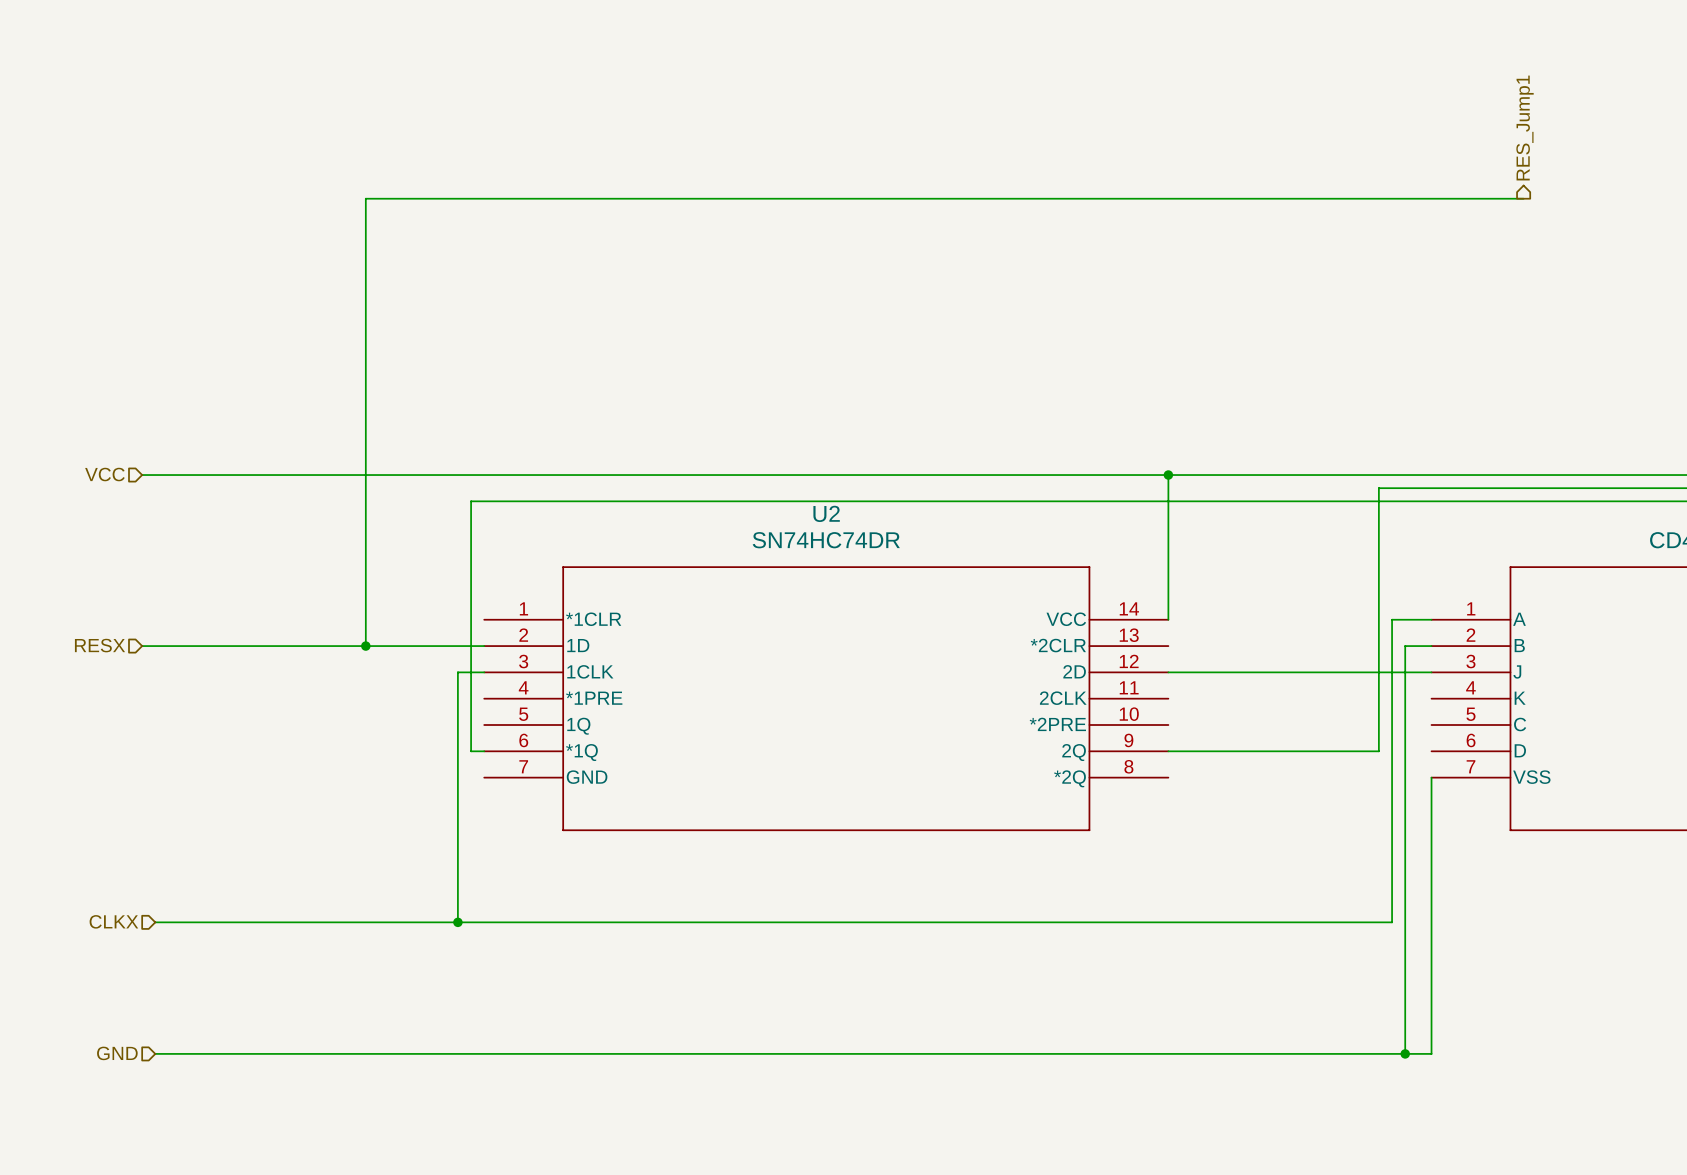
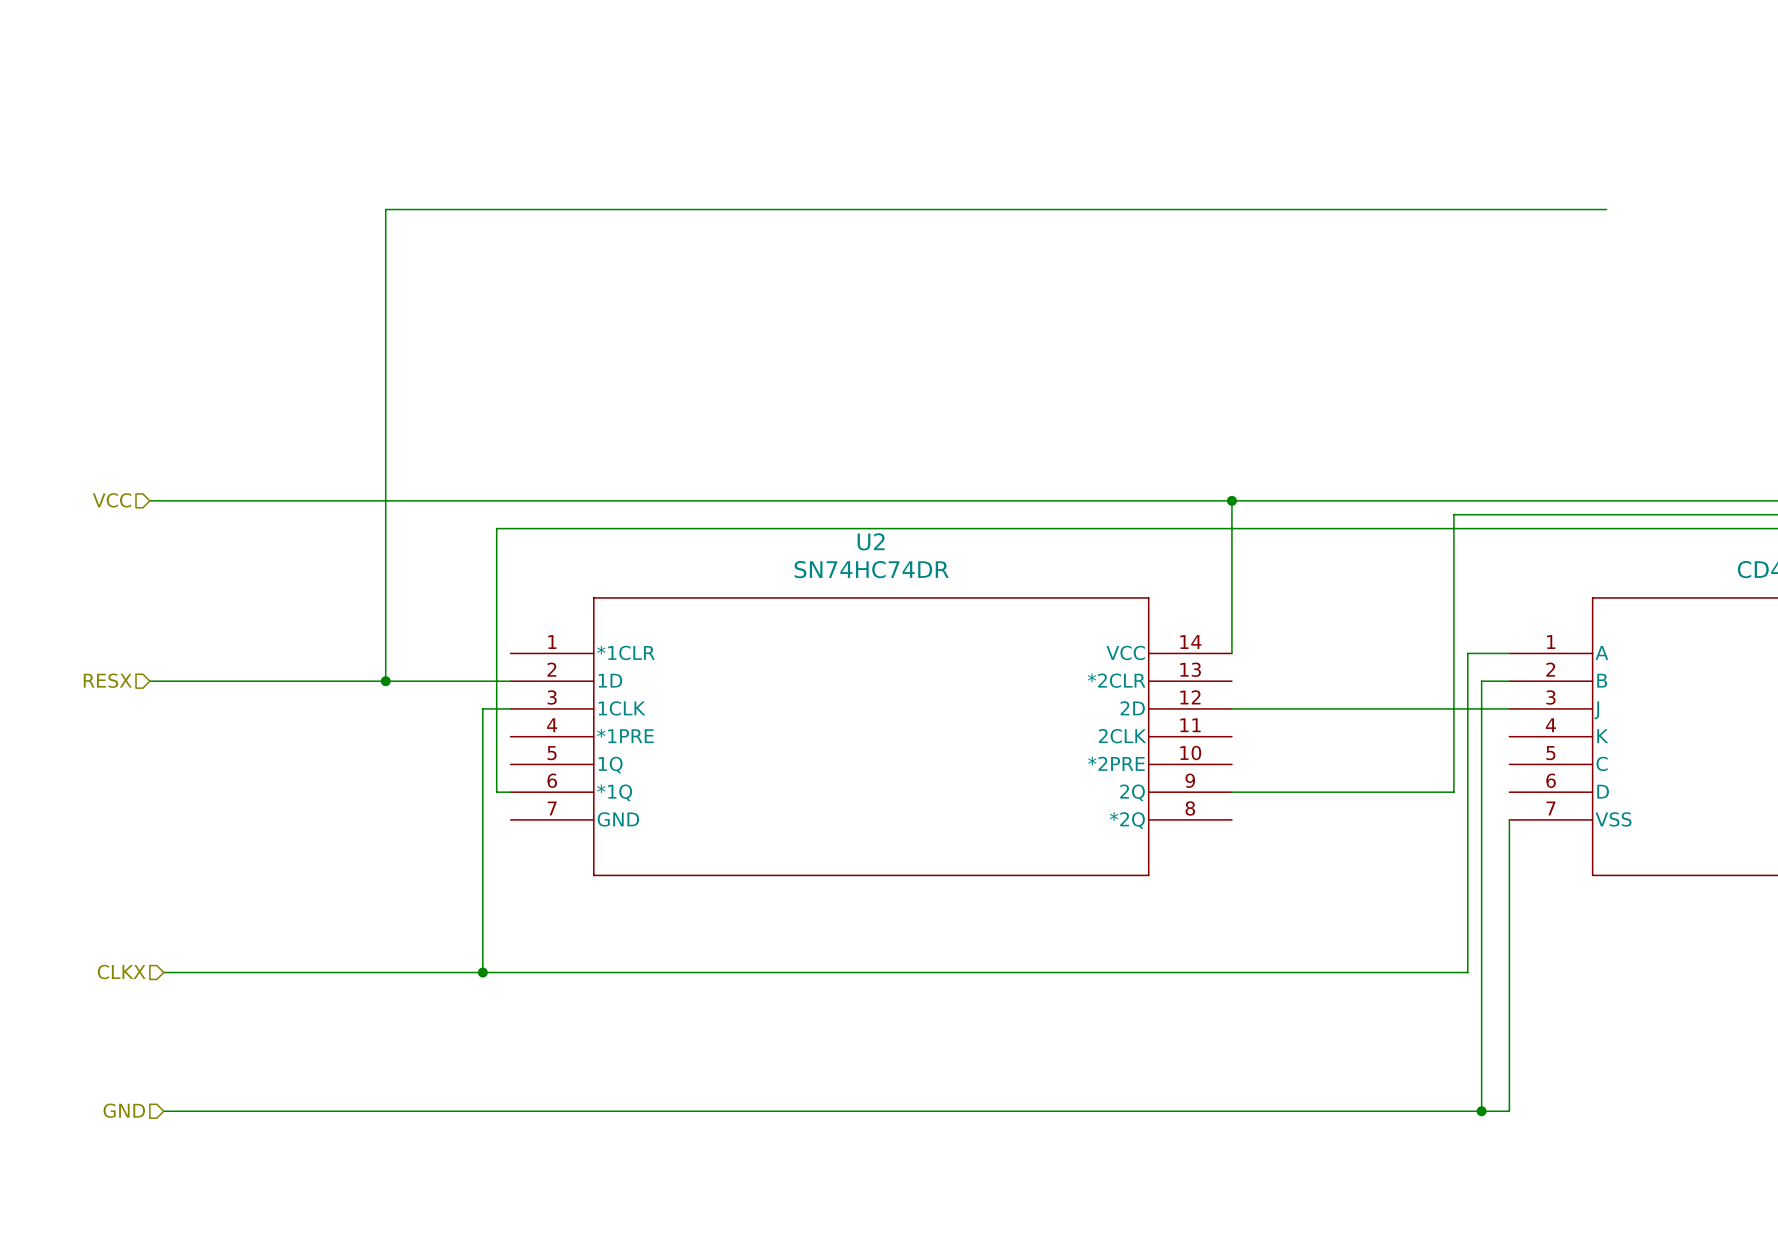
hierarchical label: RES_Jump1 (1525, 128) -> none

